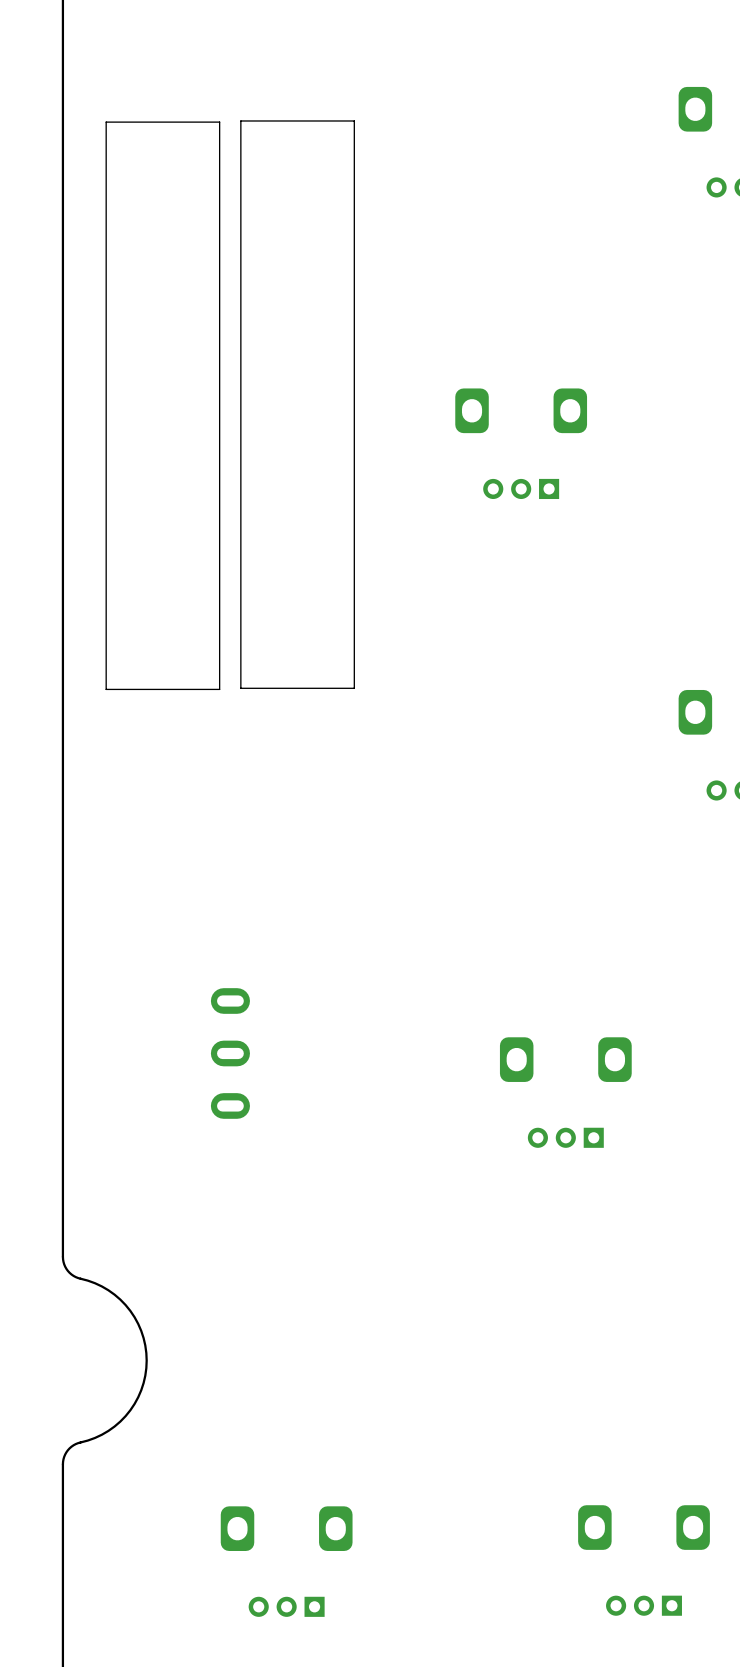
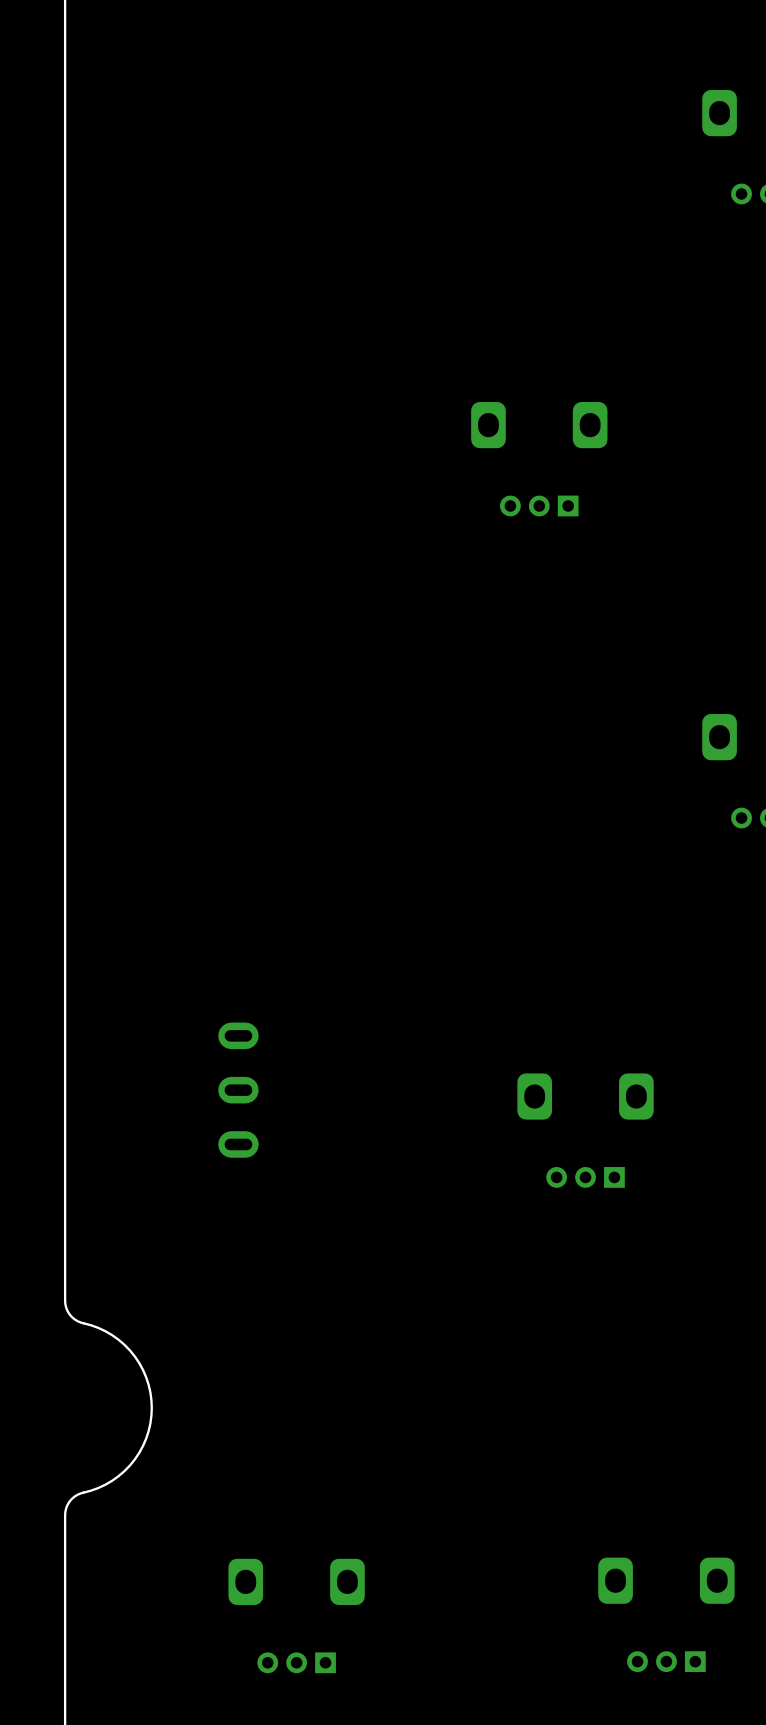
part: (297, 404) -> none
part: (162, 405) -> none

